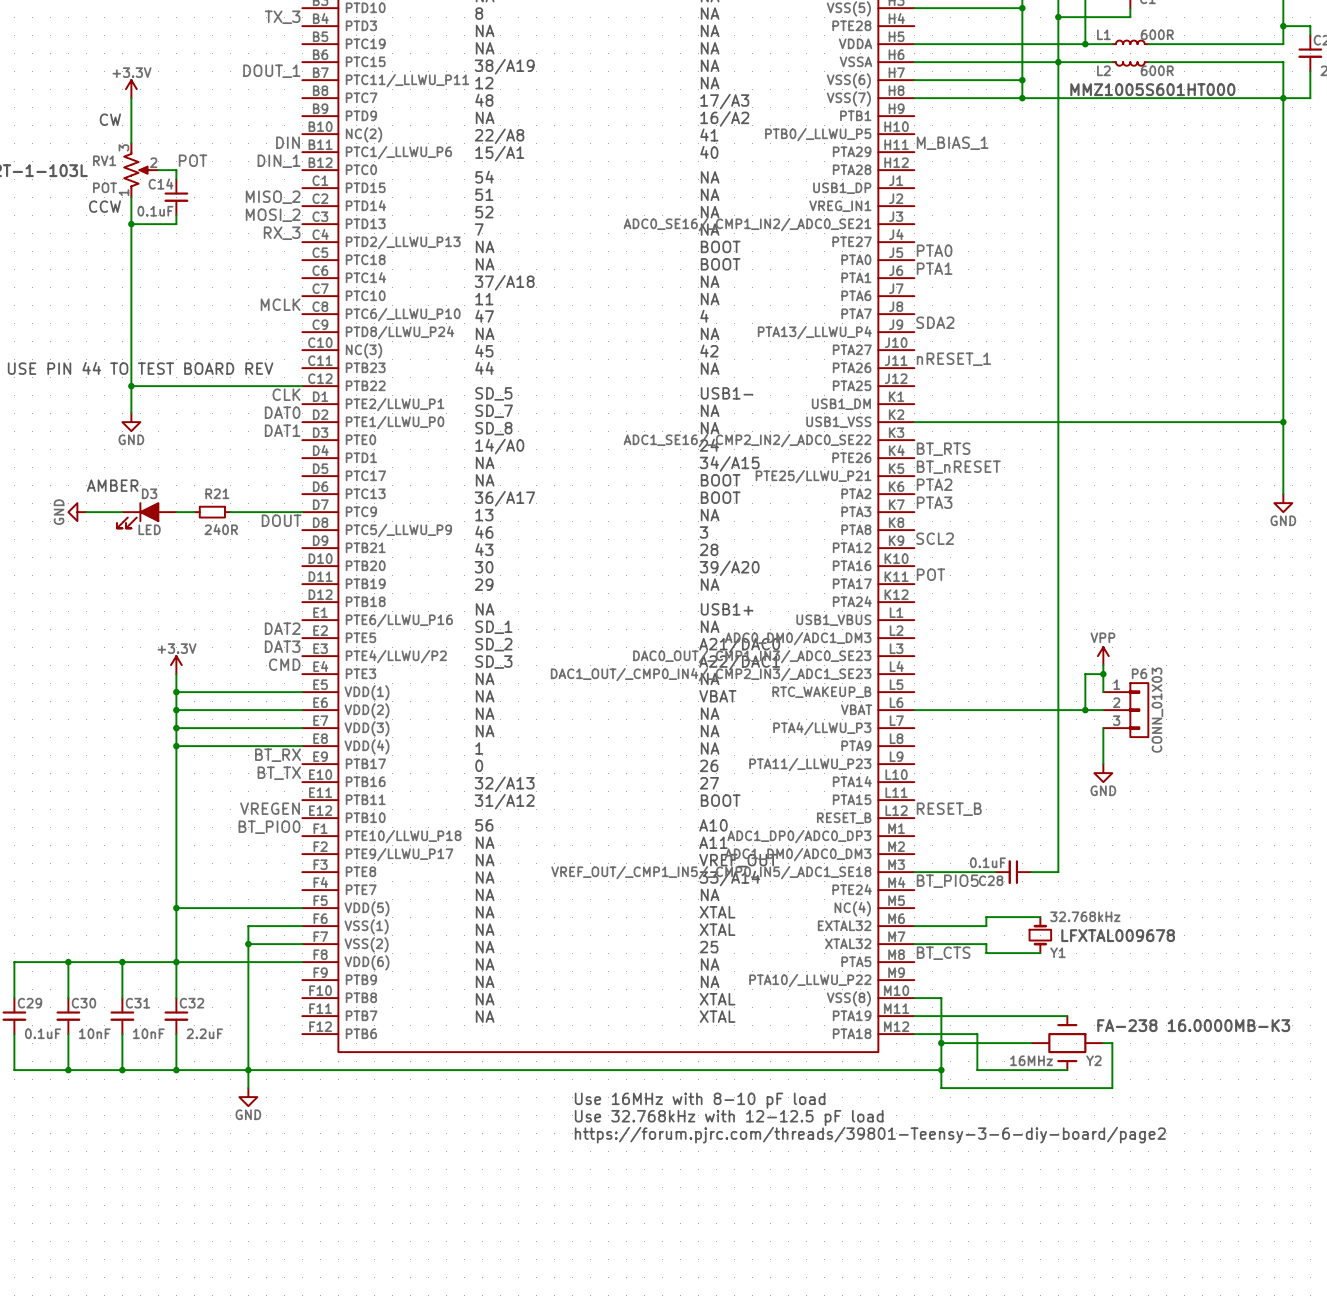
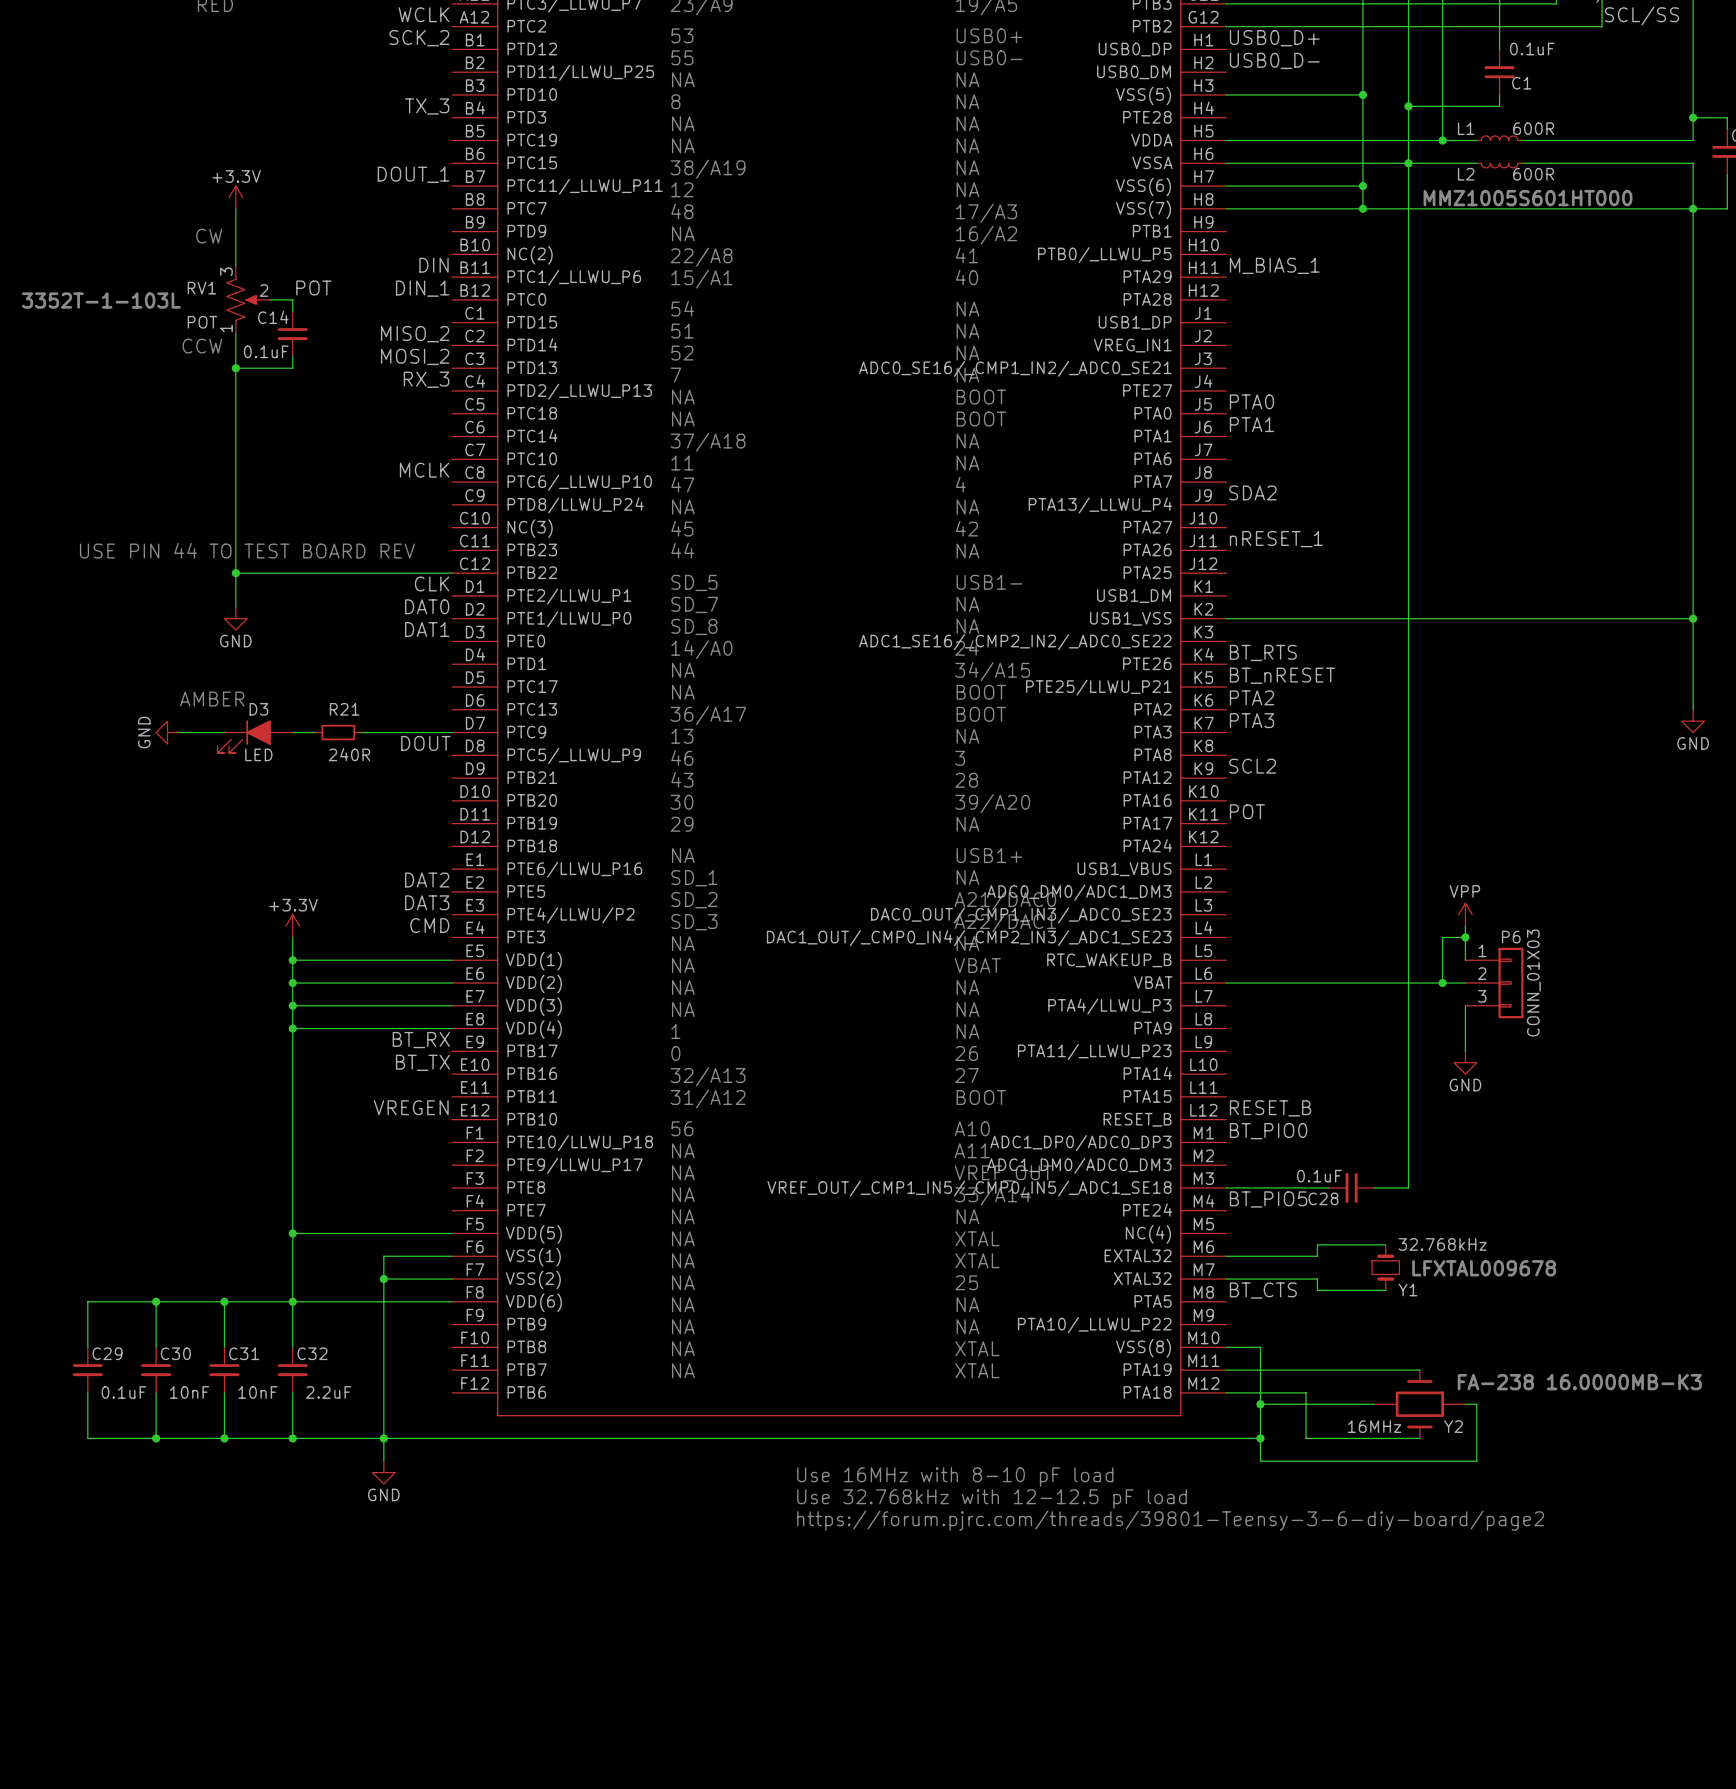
label: BT_PIO0 (269, 827) -> none
label: none -> BT_PIO0 (1268, 1131)

